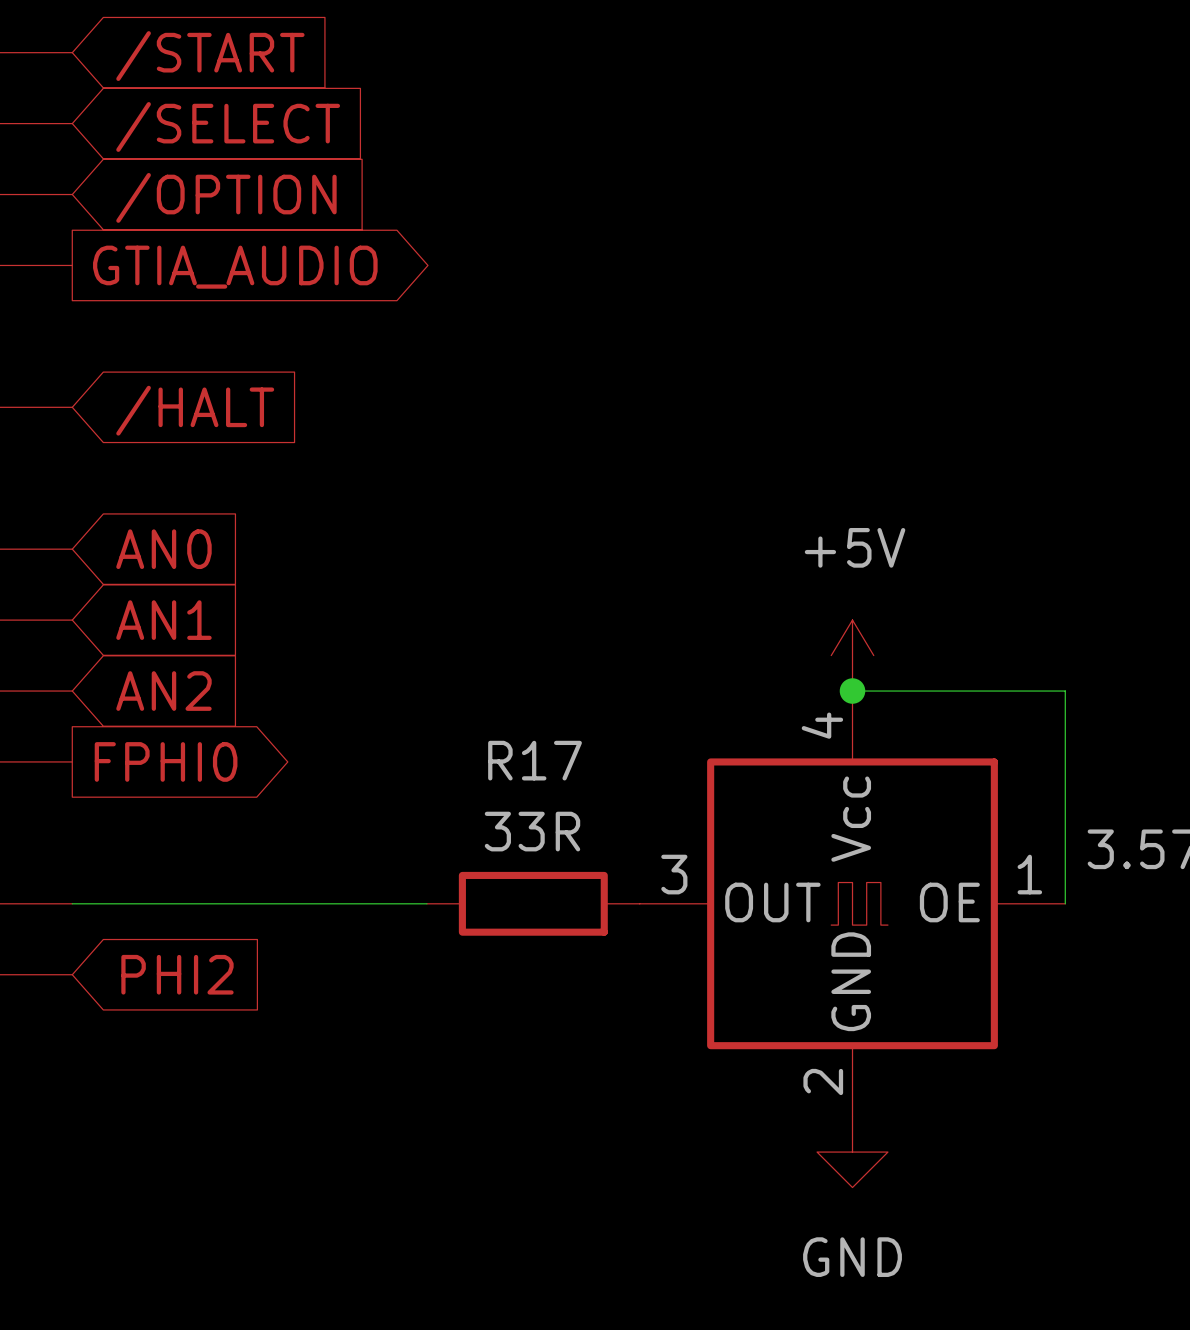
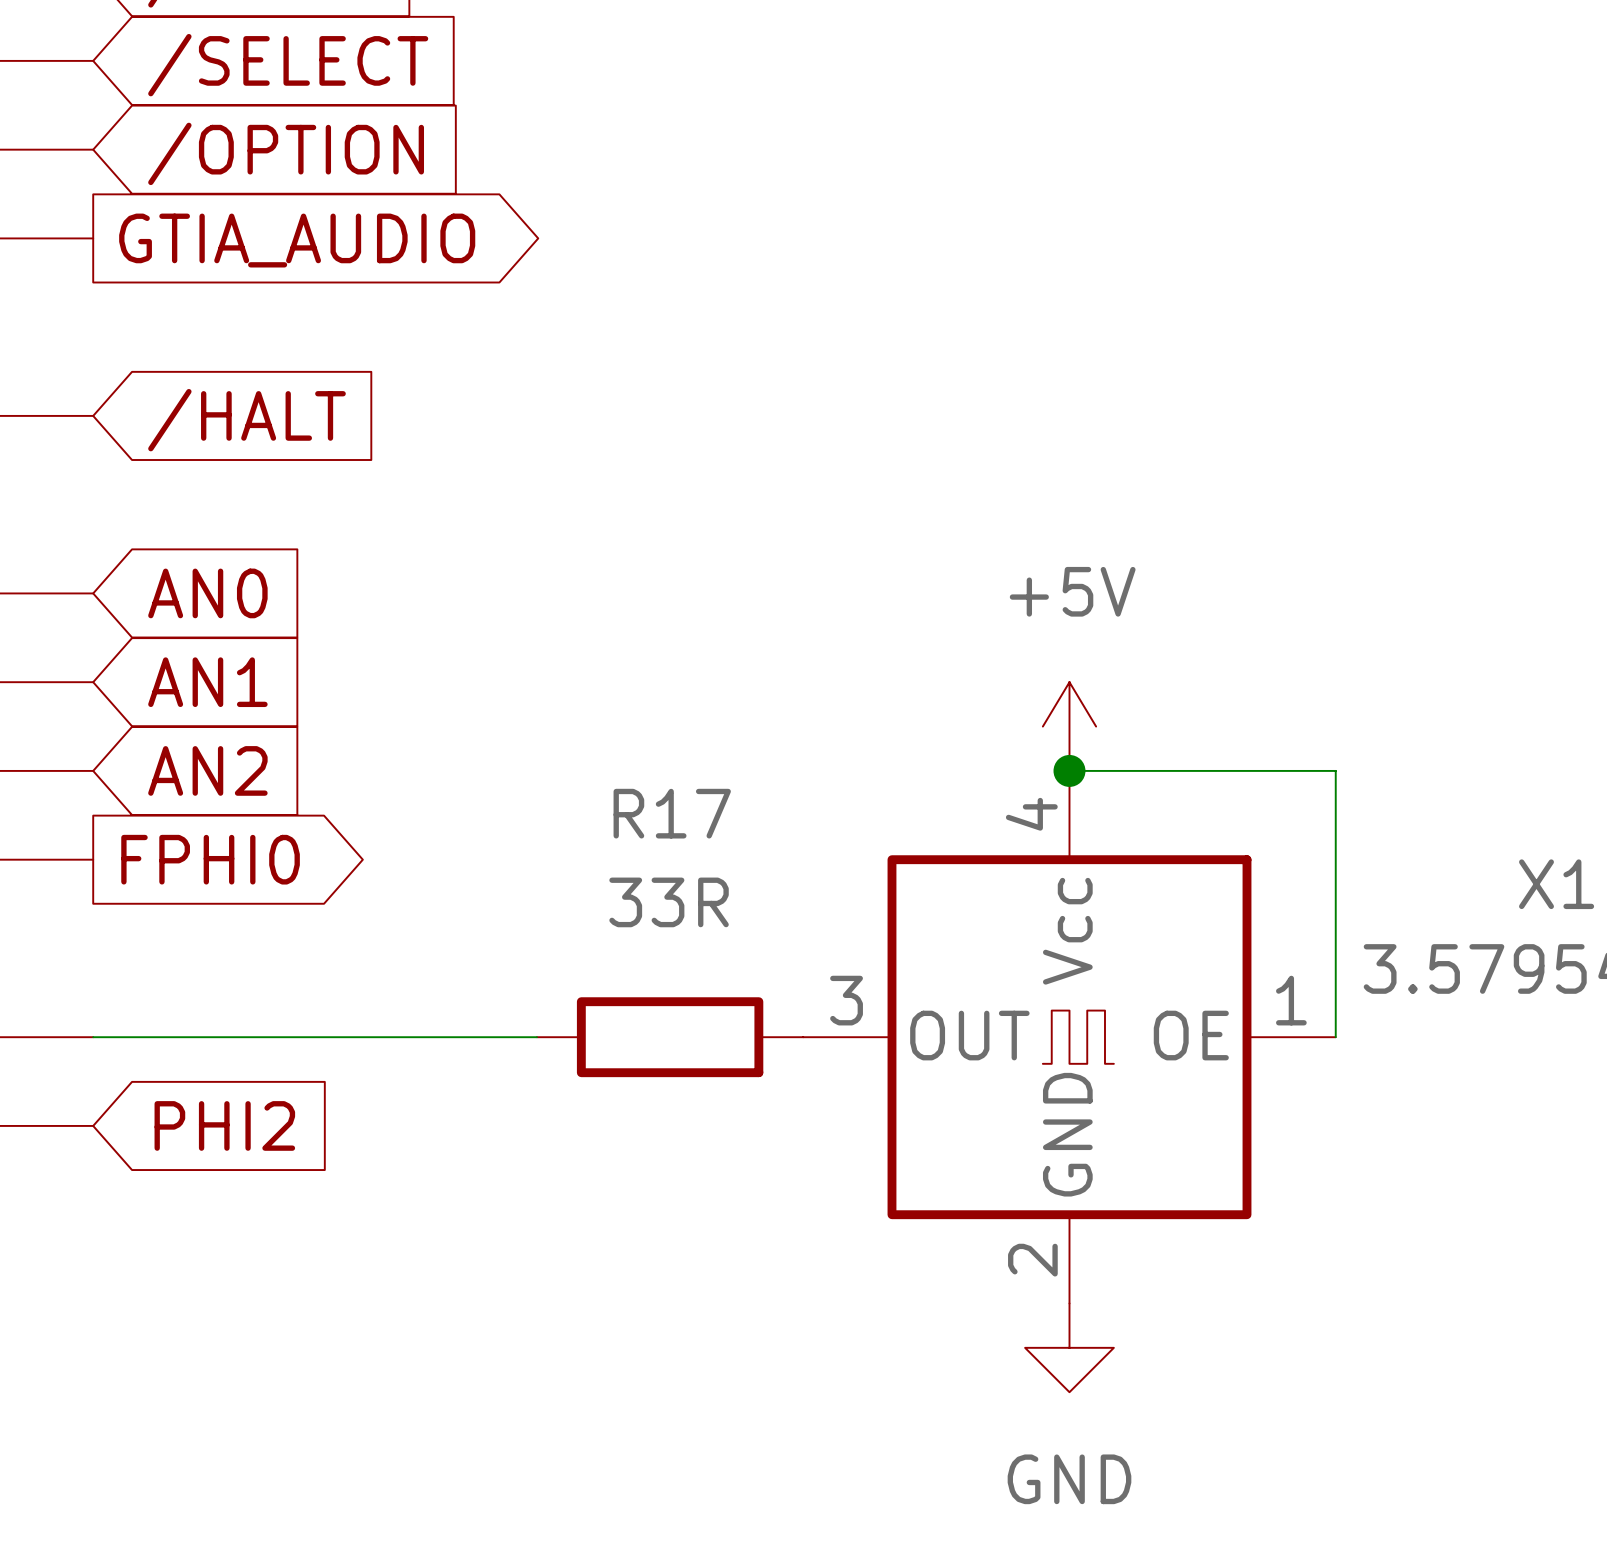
R17 name position: R17 (535, 760) -> R17 (672, 813)
R17 value position: 33R (532, 831) -> 33R (669, 902)

